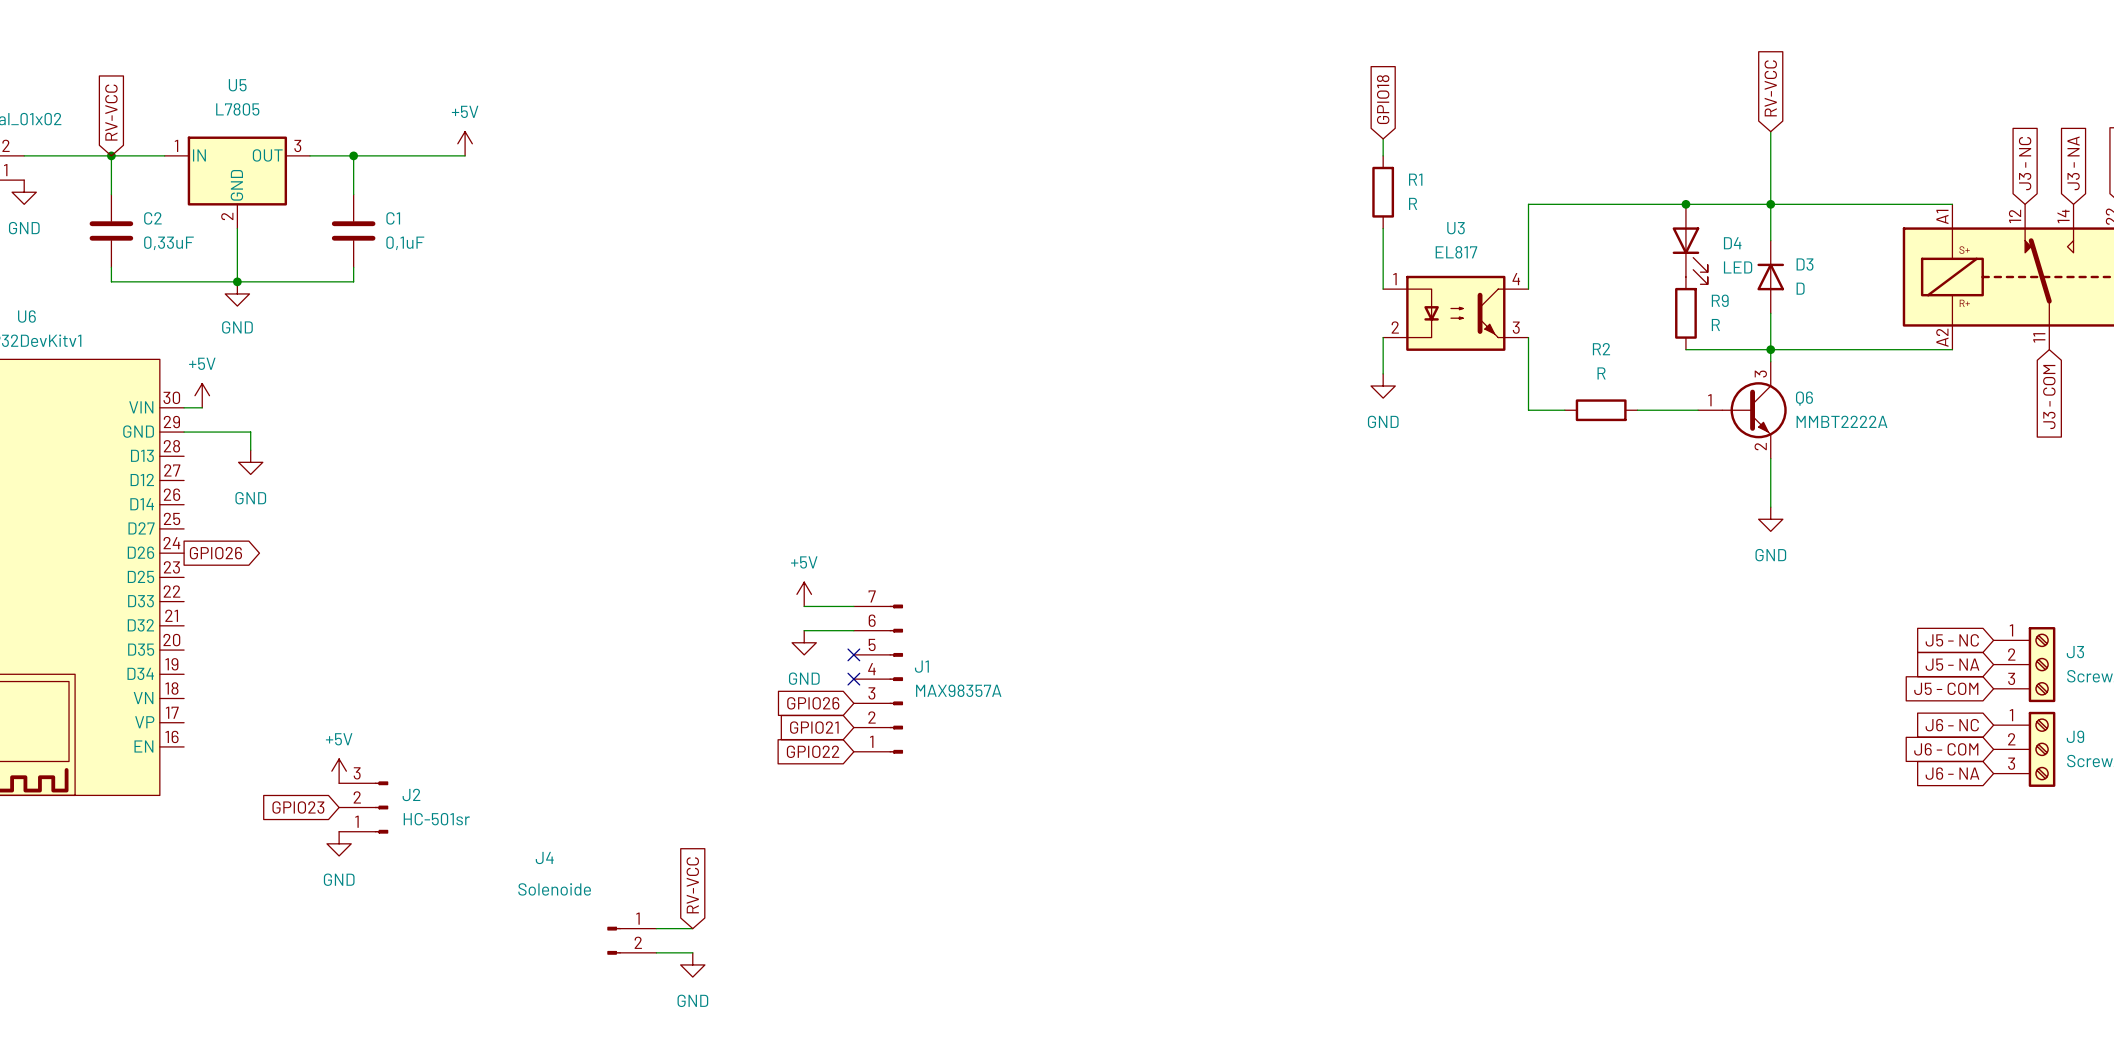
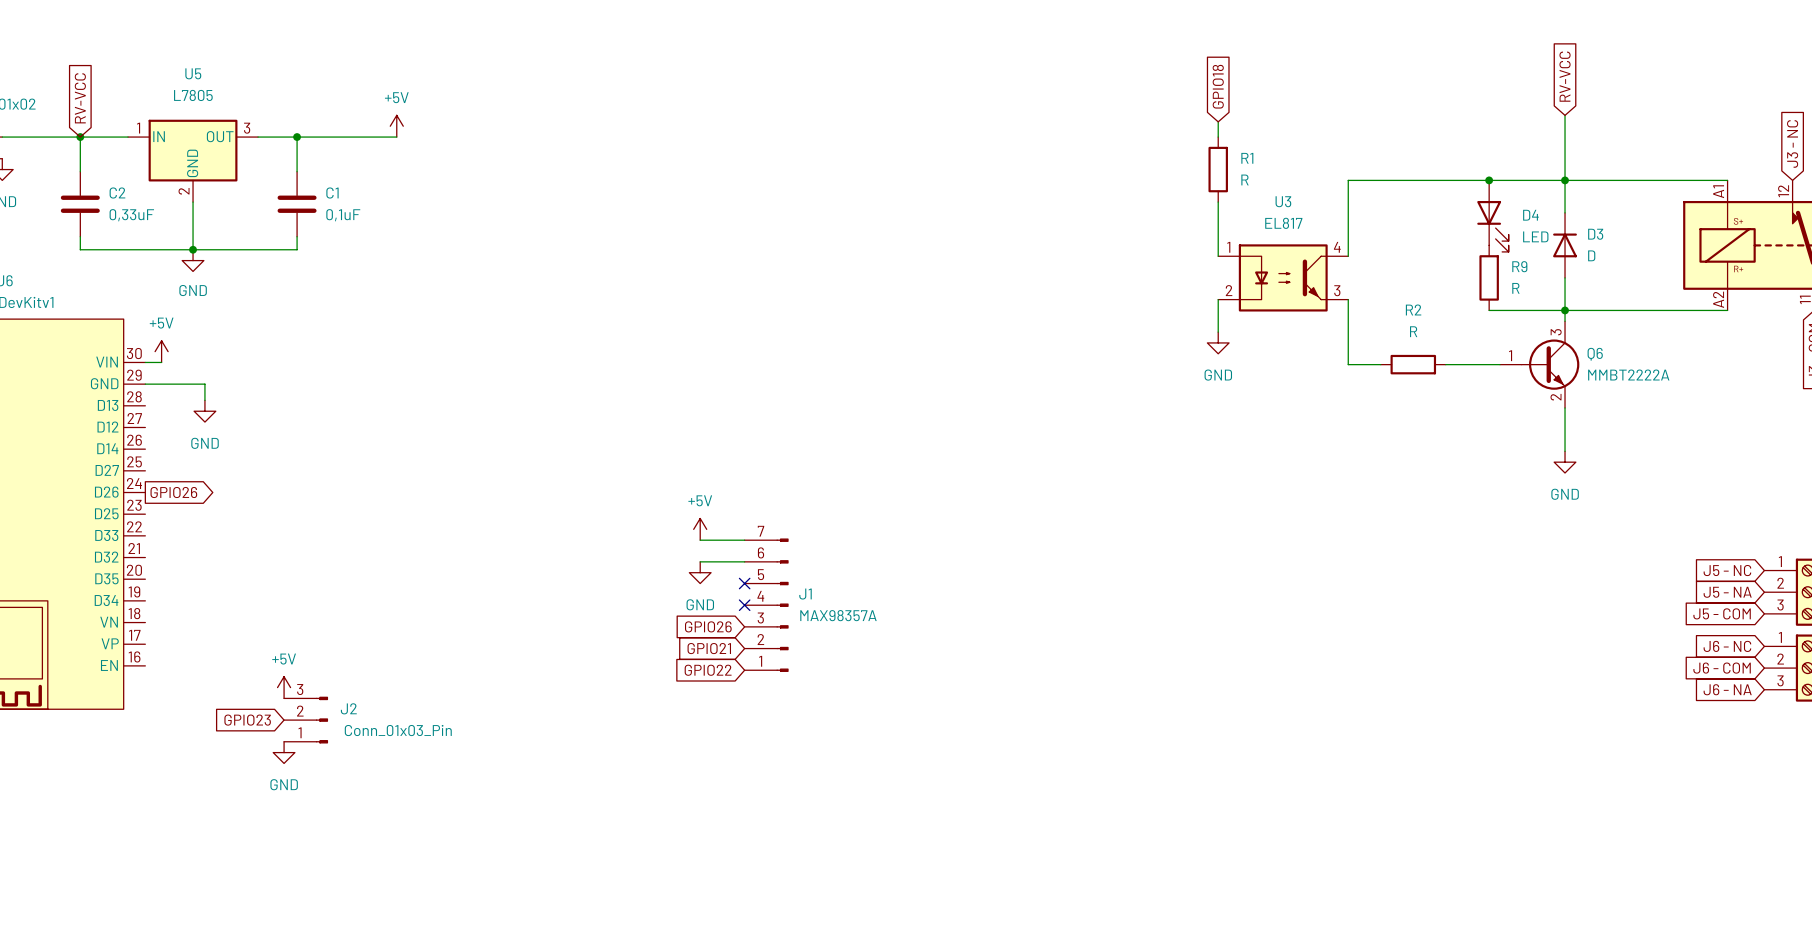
J2 value: HC-501sr (436, 819) -> Conn_01x03_Pin (398, 730)
global label: RV-VCC (692, 885) -> none
wire: (656, 928) (692, 928) -> none
J4: Solenoide (631, 940) -> none
wire: (656, 952) (692, 952) -> none
power symbol: GND (692, 964) -> none

